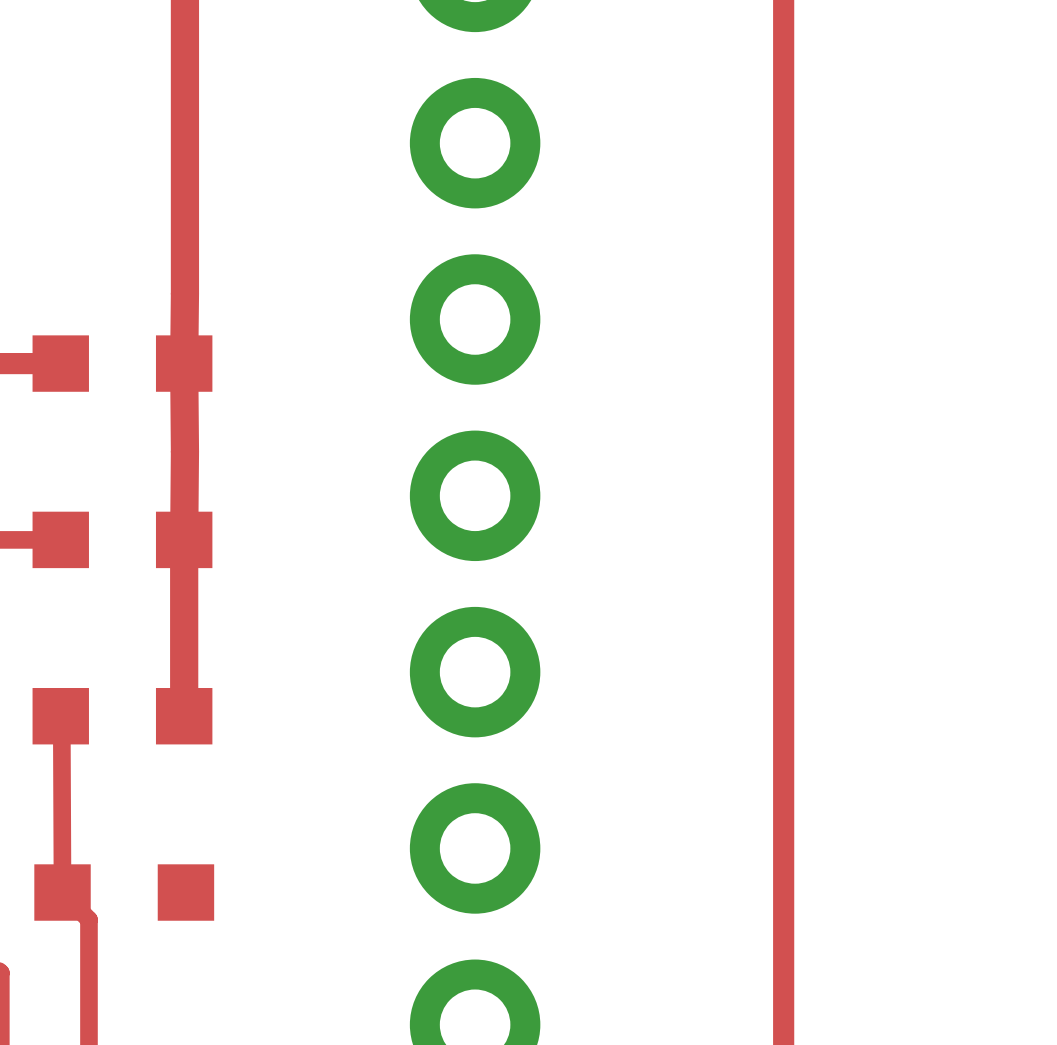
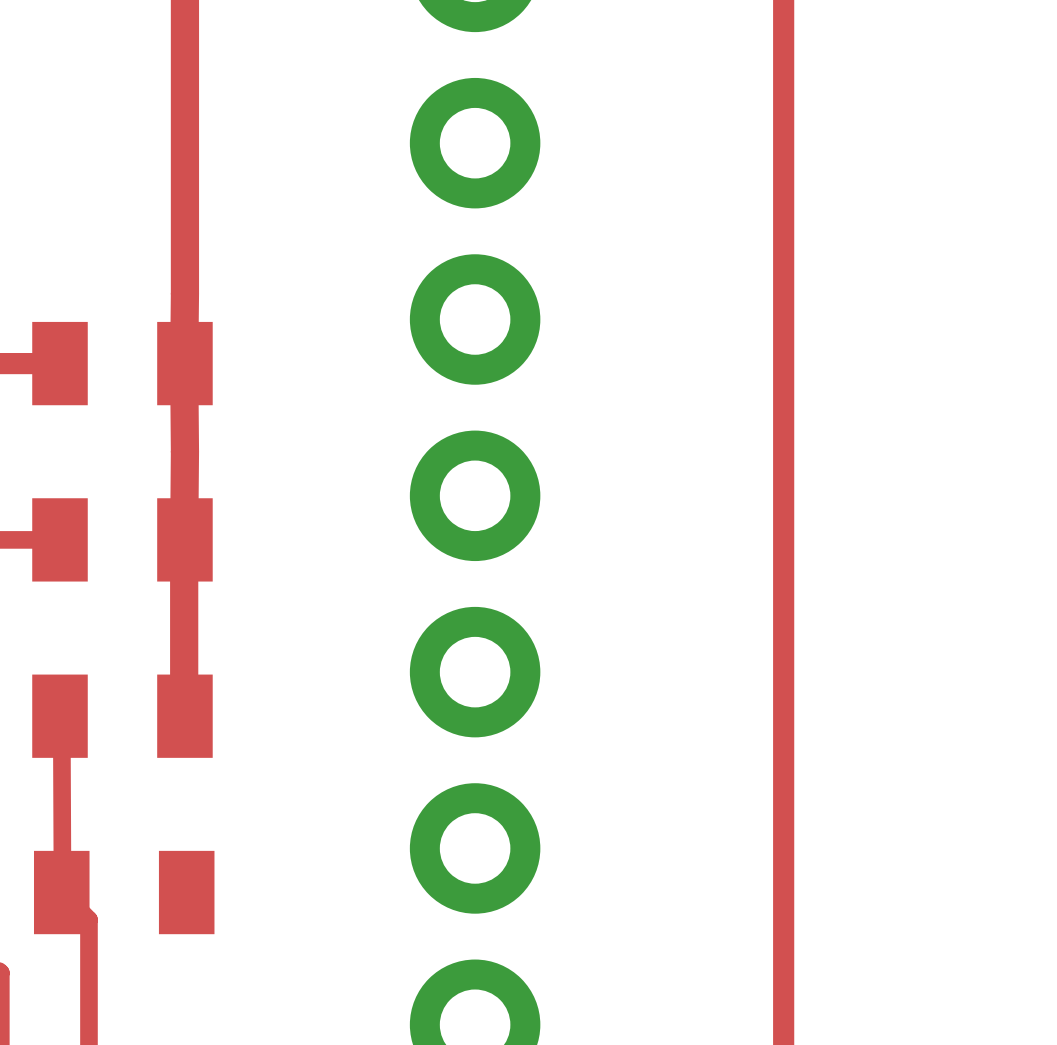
part footprint: [32, 335, 213, 392] -> [32, 321, 213, 406]
part footprint: [32, 511, 213, 569] -> [32, 498, 213, 582]
part footprint: [32, 688, 213, 745] -> [32, 674, 213, 758]
part footprint: [34, 864, 215, 921] -> [33, 850, 215, 935]

